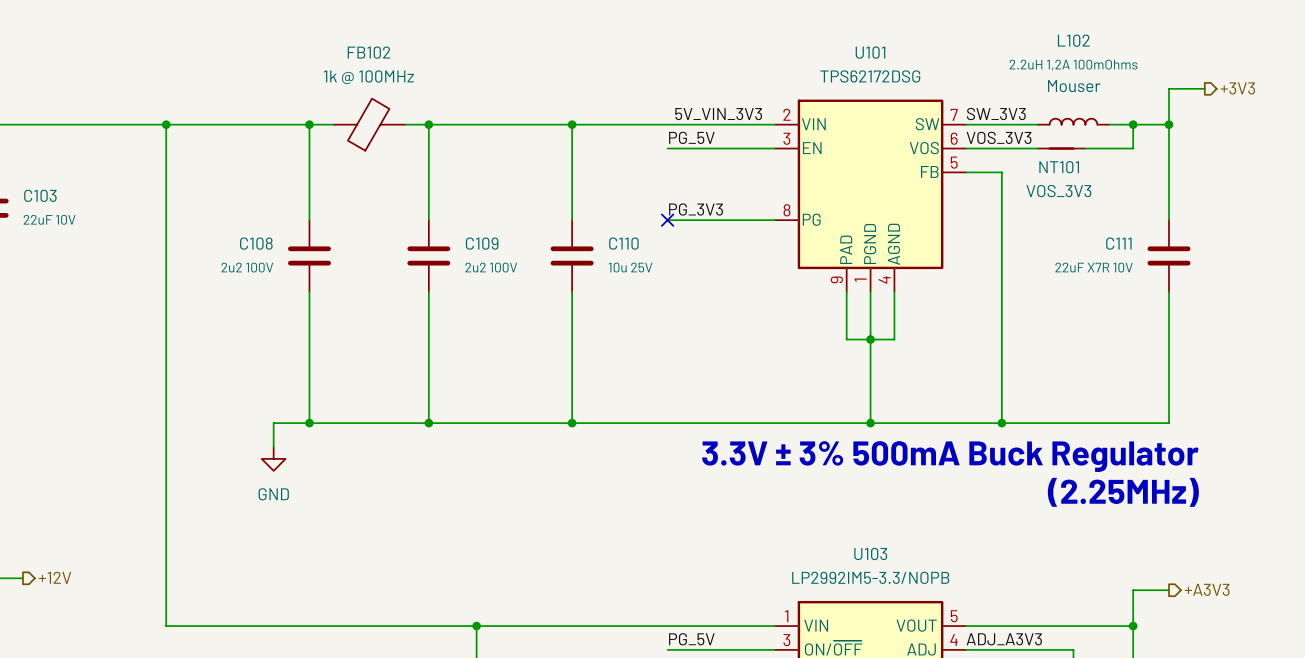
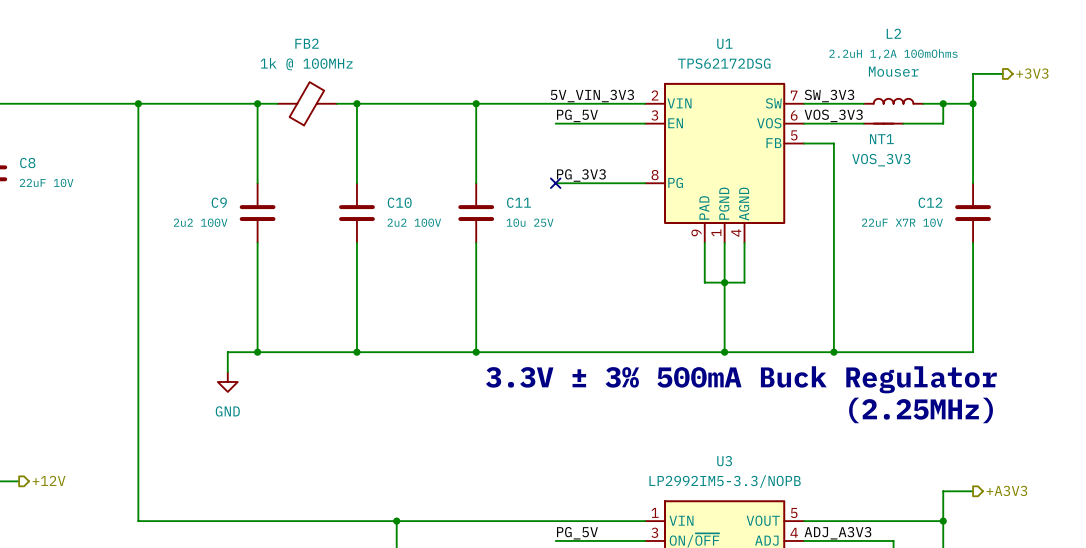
L102 name: L102 (1073, 40) -> L2 (893, 33)
FB102 name: FB102 (368, 52) -> FB2 (307, 43)
U101 name: U101 (870, 52) -> U1 (724, 43)
NT101 name: NT101 (1059, 167) -> NT1 (881, 139)
C103 name: C103 (40, 195) -> C8 (27, 163)
C108 name: C108 (256, 243) -> C9 (219, 202)
C109 name: C109 (482, 243) -> C10 (399, 202)
C110 name: C110 (623, 243) -> C11 (518, 202)
C111 name: C111 (1118, 243) -> C12 (930, 202)
U103 name: U103 (870, 553) -> U3 (724, 461)

